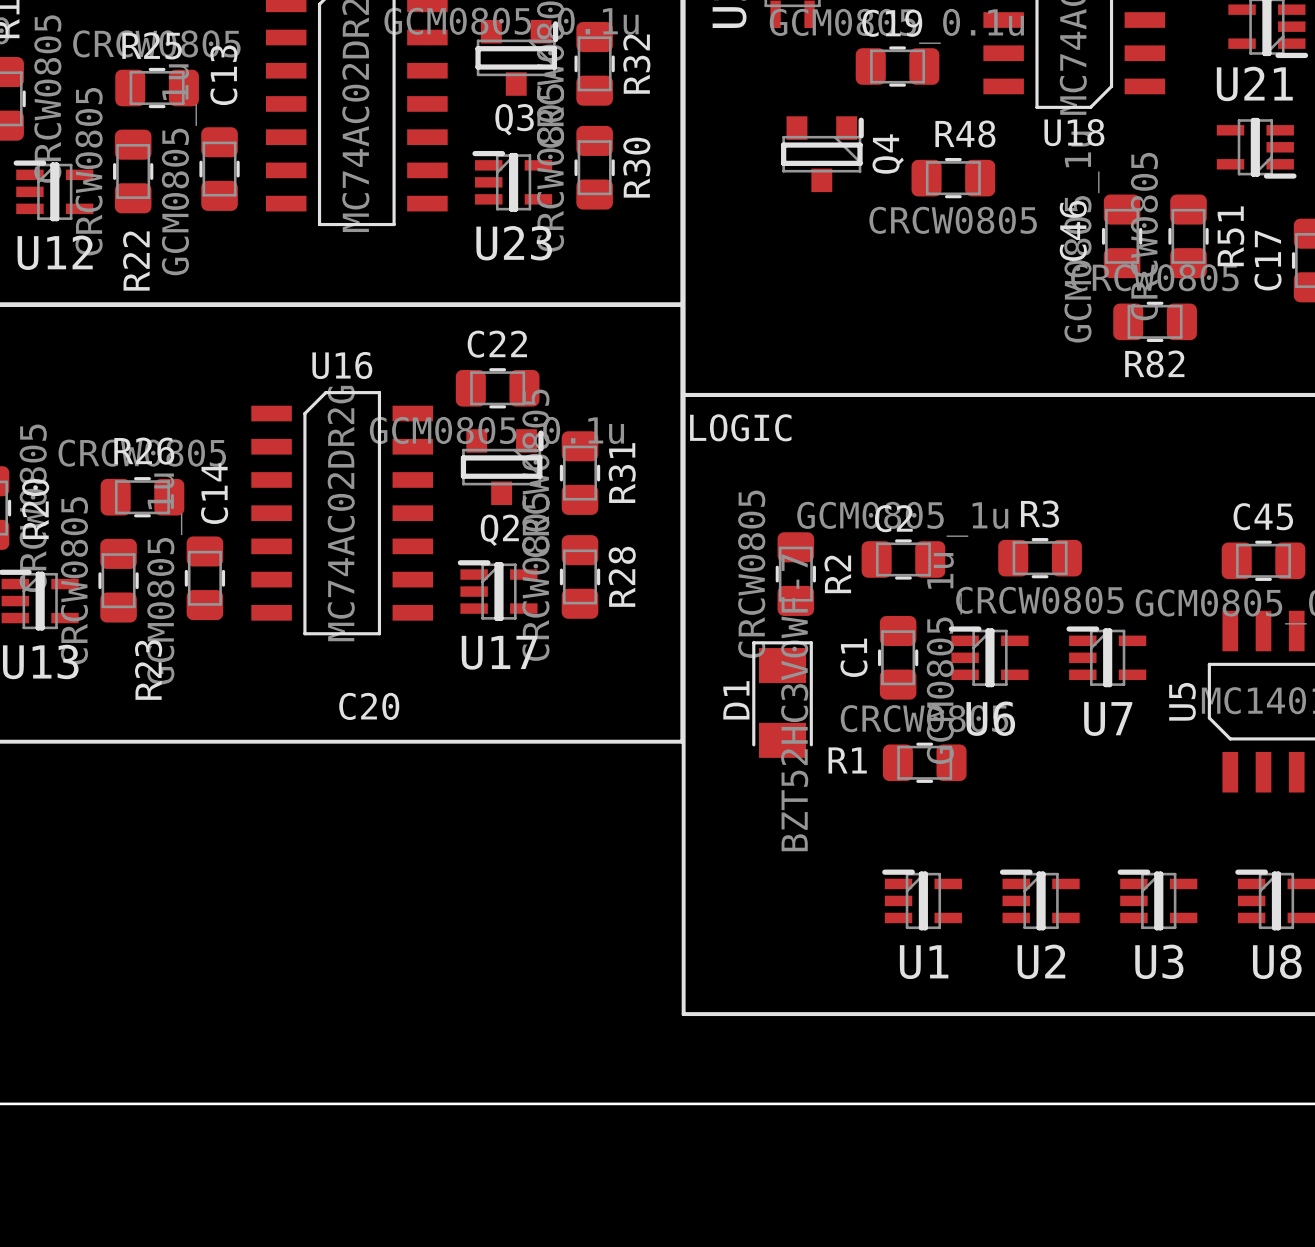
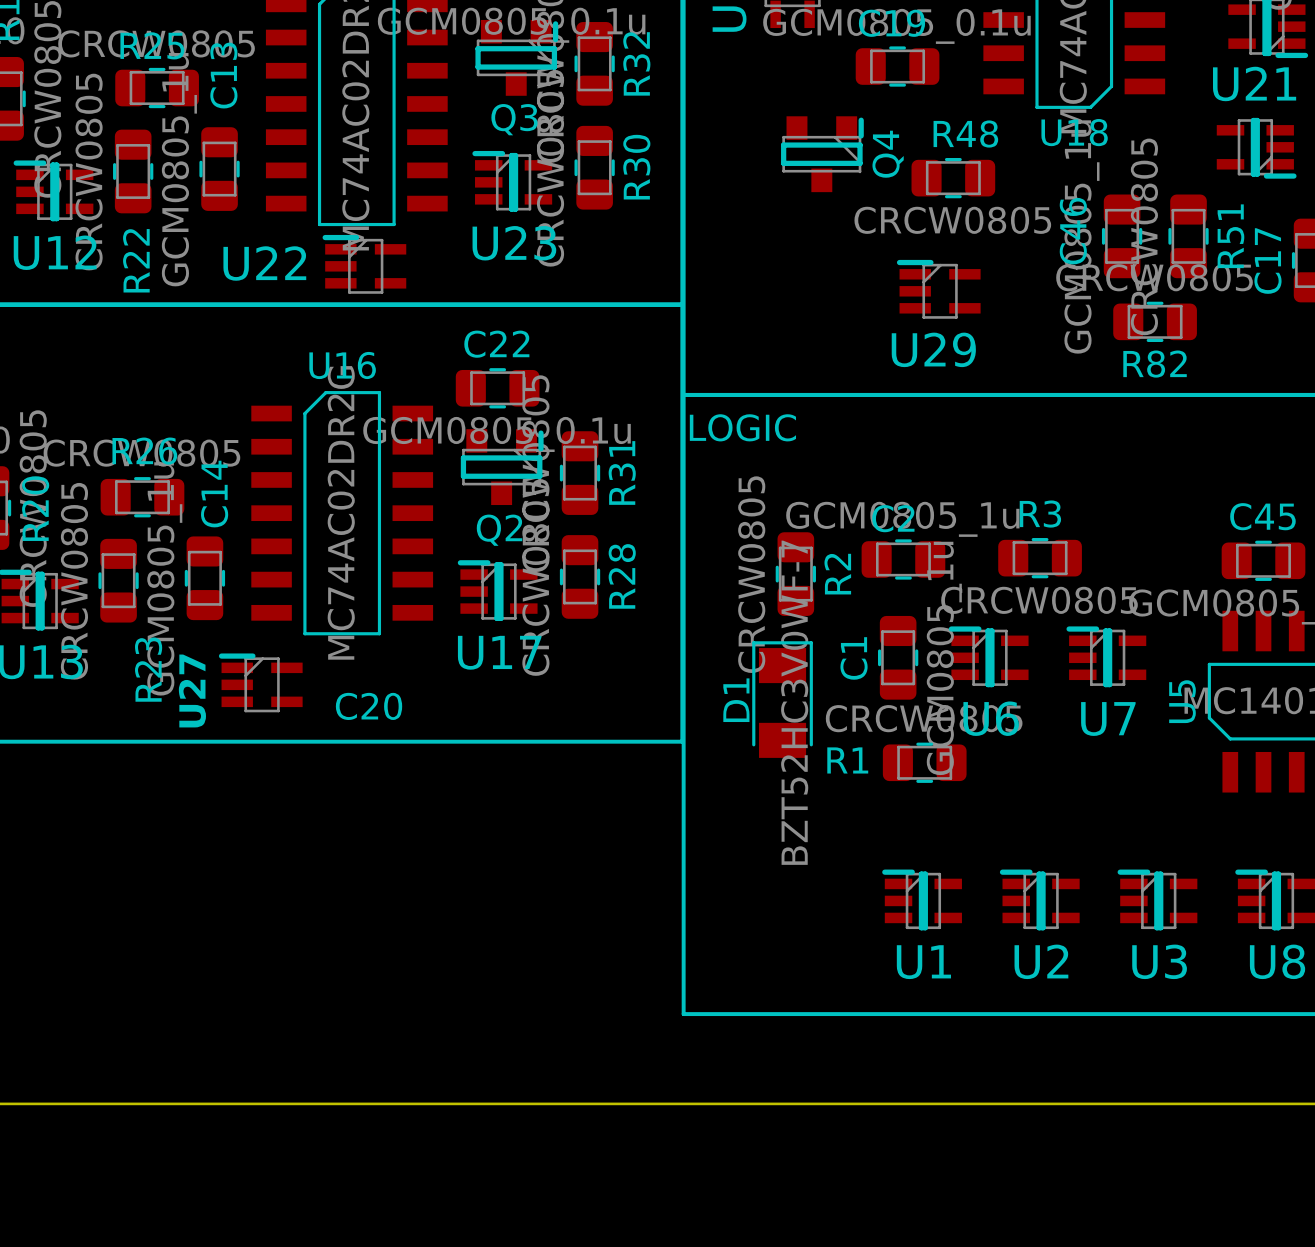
U22: none -> (364, 264)
U29: none -> (938, 289)
U27: none -> (260, 682)

